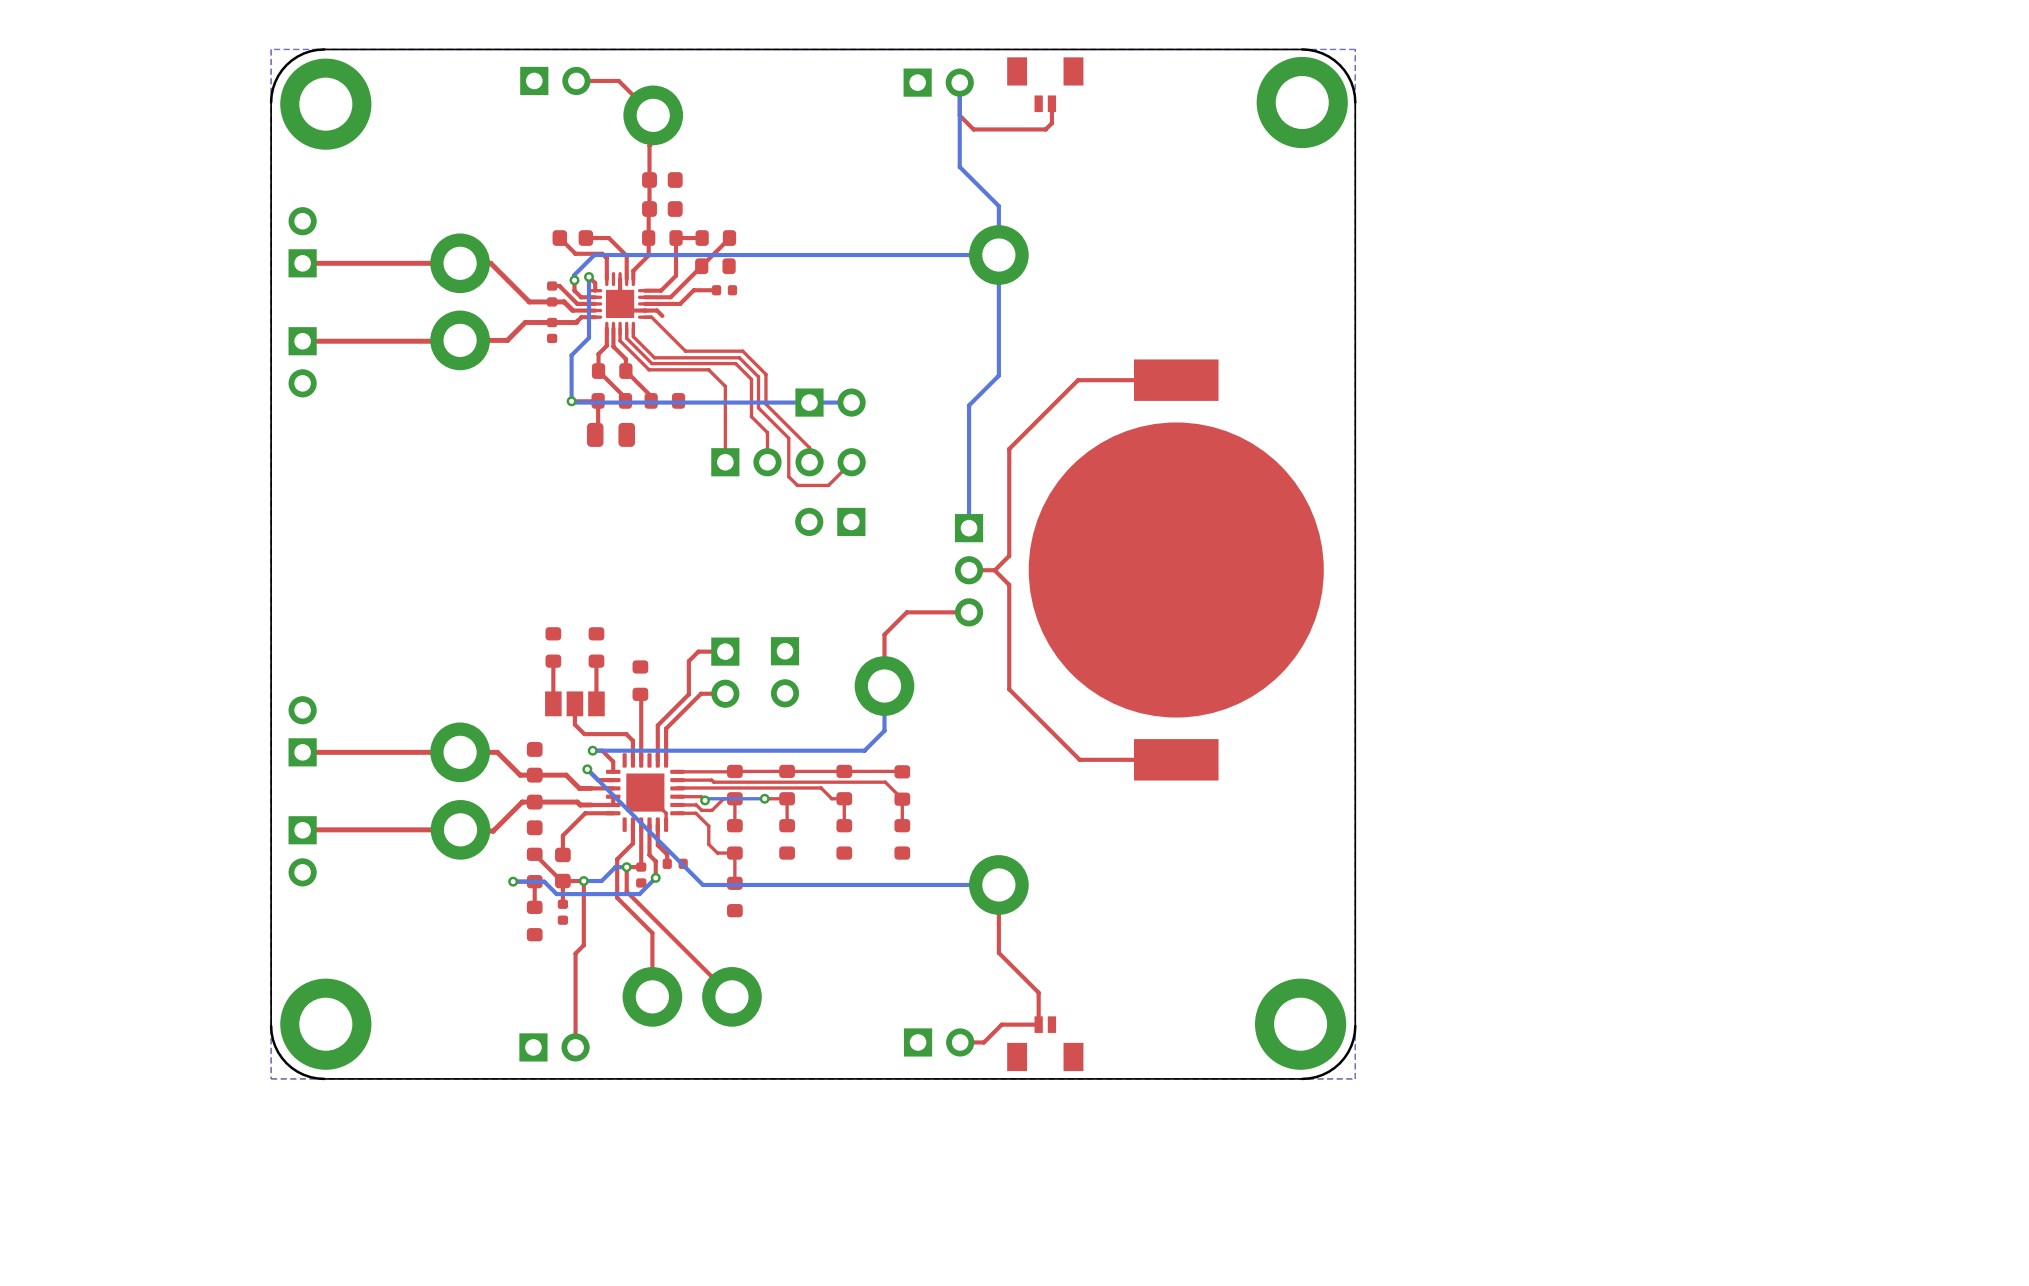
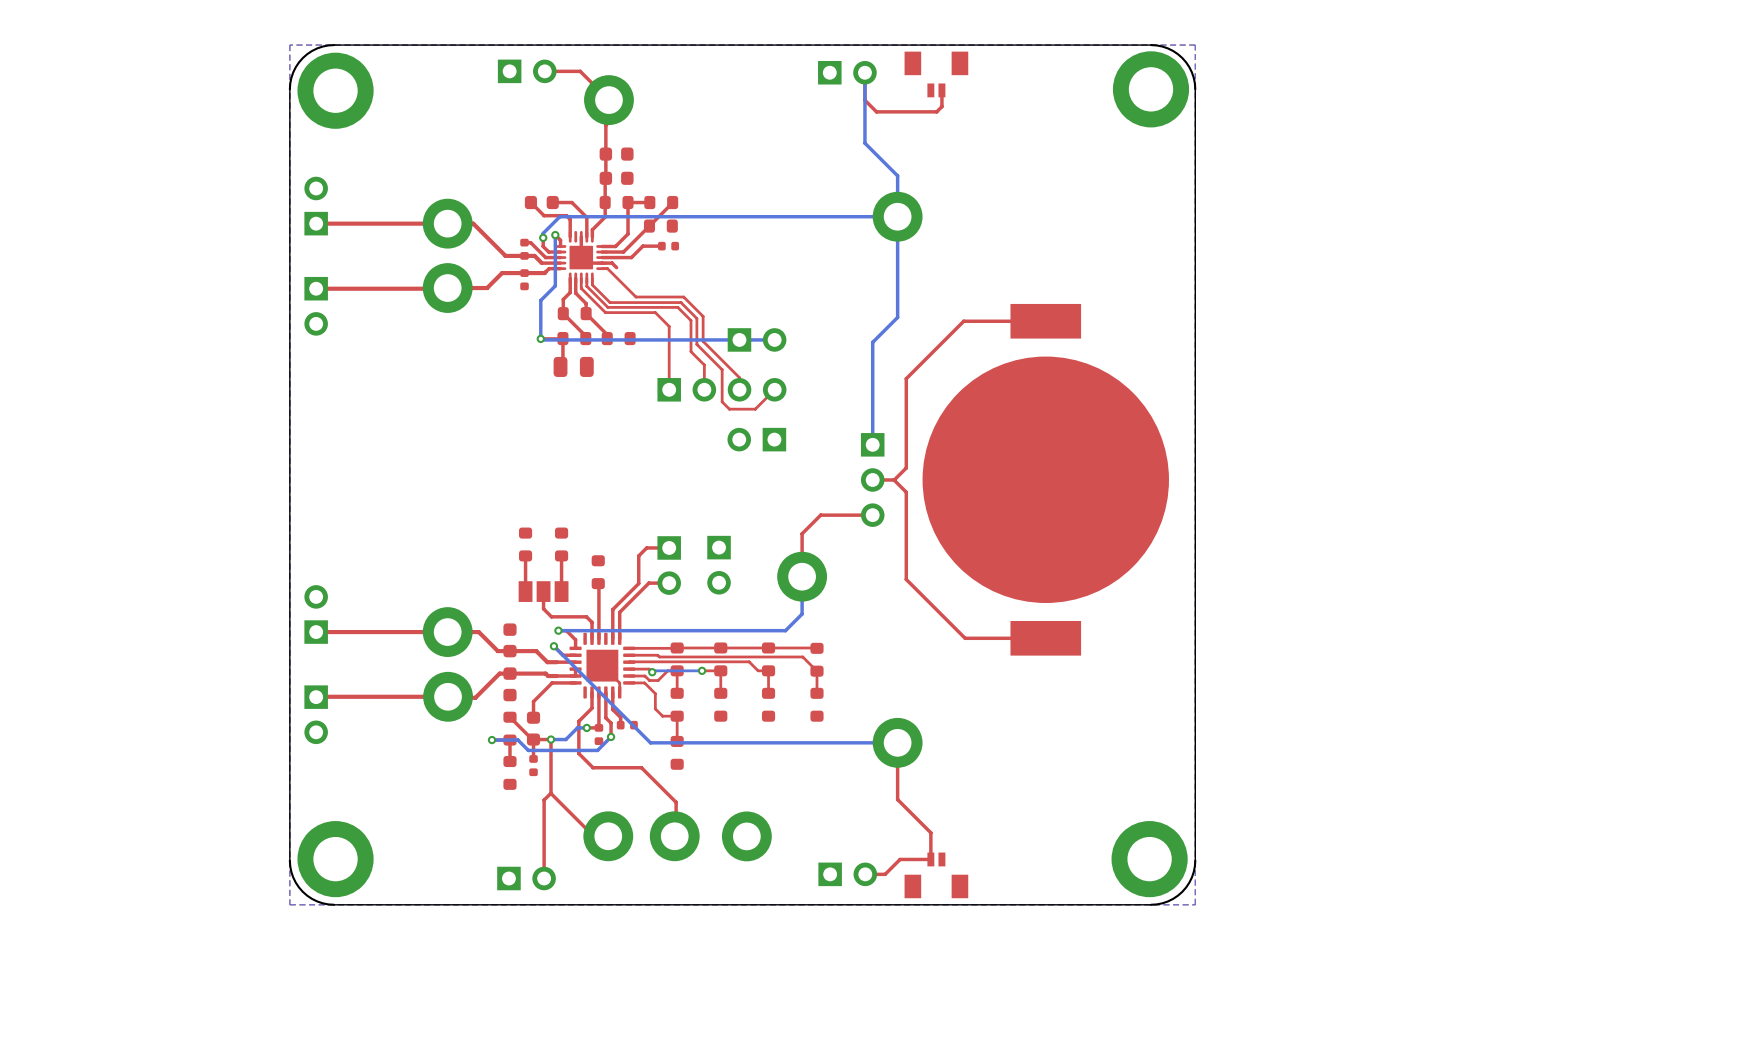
top track: (626, 867) (626, 891) (731, 996) -> none
top track: (634, 914) (652, 933) (652, 996) -> (593, 767) (641, 767) (676, 802) (676, 836)
top track: none -> (551, 793) (593, 835) (606, 835)
part: none -> (746, 836)

